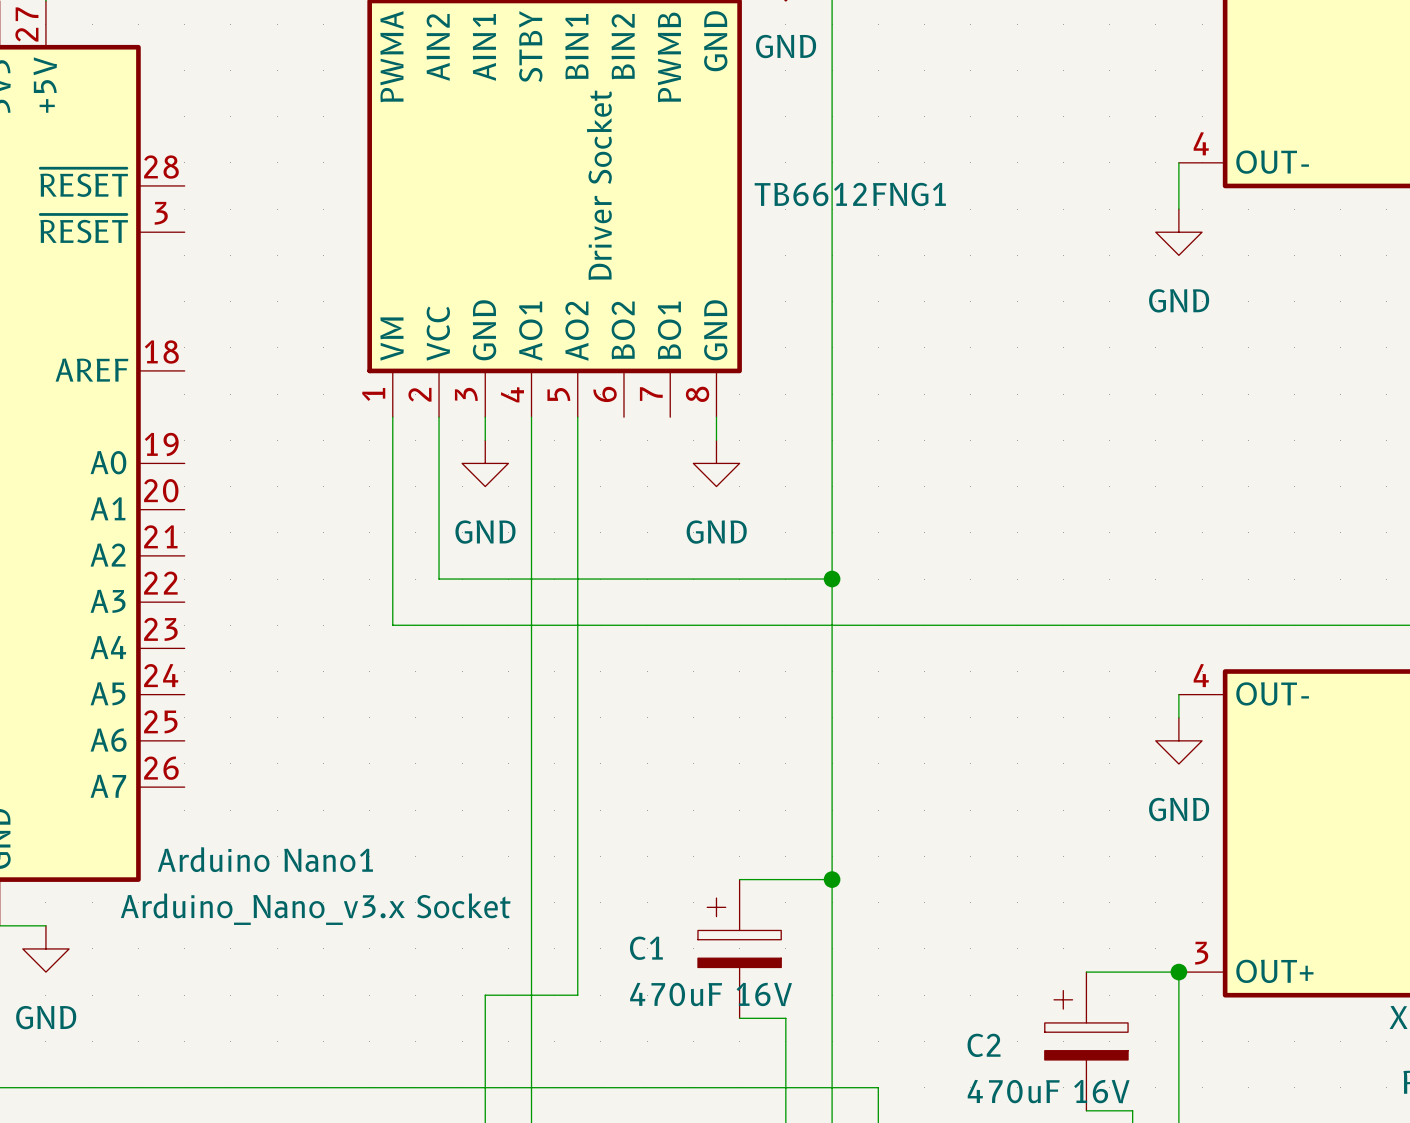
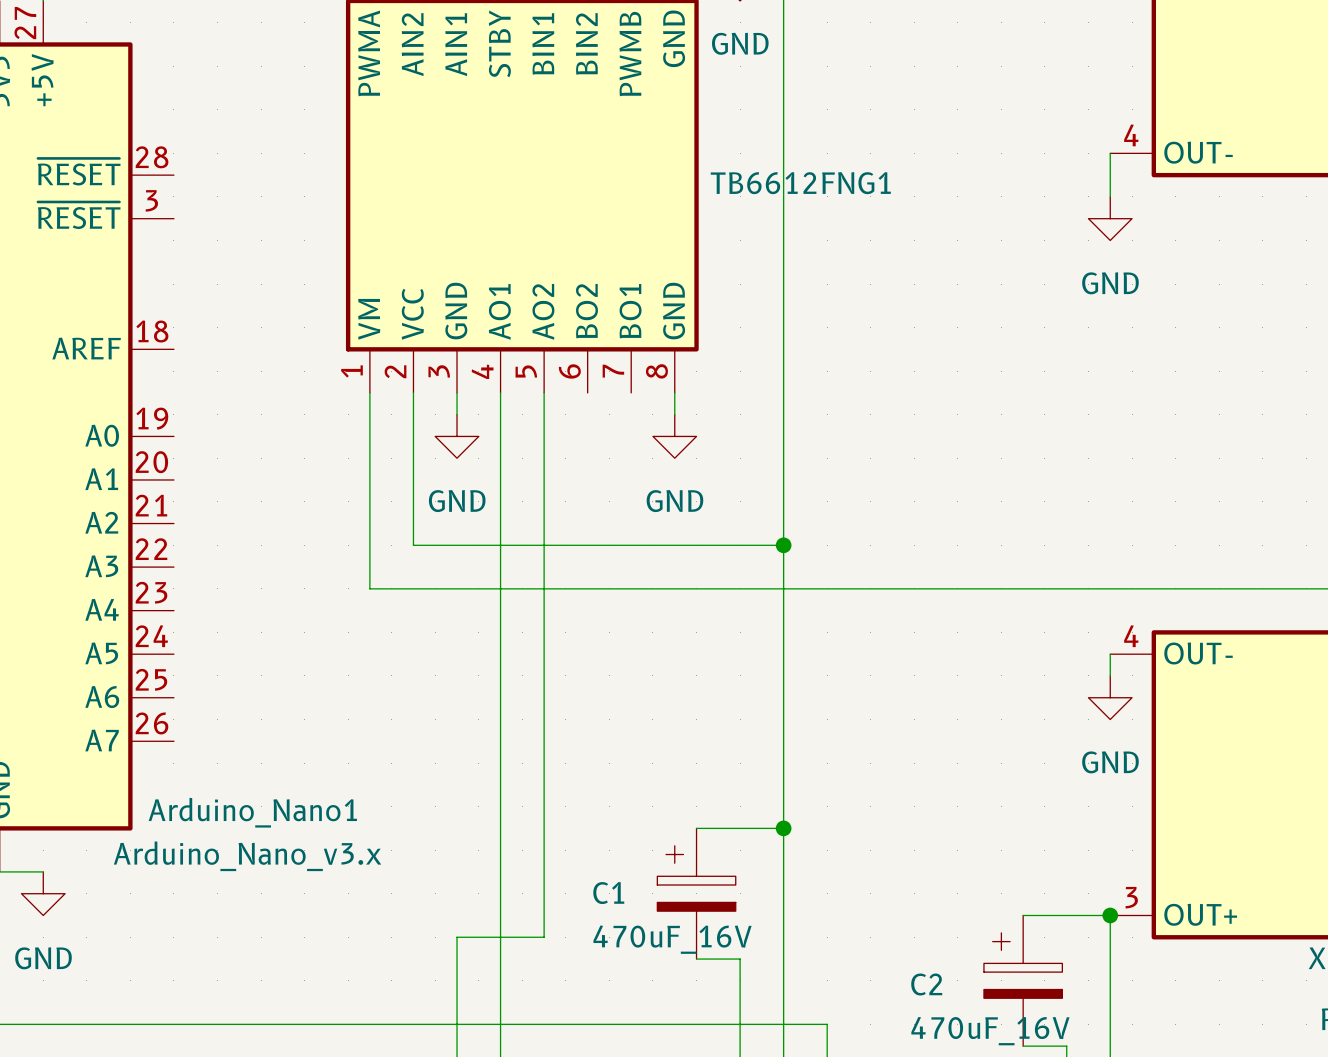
TB6612FNG1 value: Driver Socket (599, 185) -> none
Arduino Nano1 name: Arduino Nano1 (265, 859) -> Arduino_Nano1 (252, 812)
Arduino Nano1 value: Arduino_Nano_v3.x Socket (315, 909) -> Arduino_Nano_v3.x (247, 856)
C1 value: 470uF 16V (711, 994) -> 470uF_16V (672, 939)
C2 value: 470uF 16V (1048, 1091) -> 470uF_16V (990, 1031)

